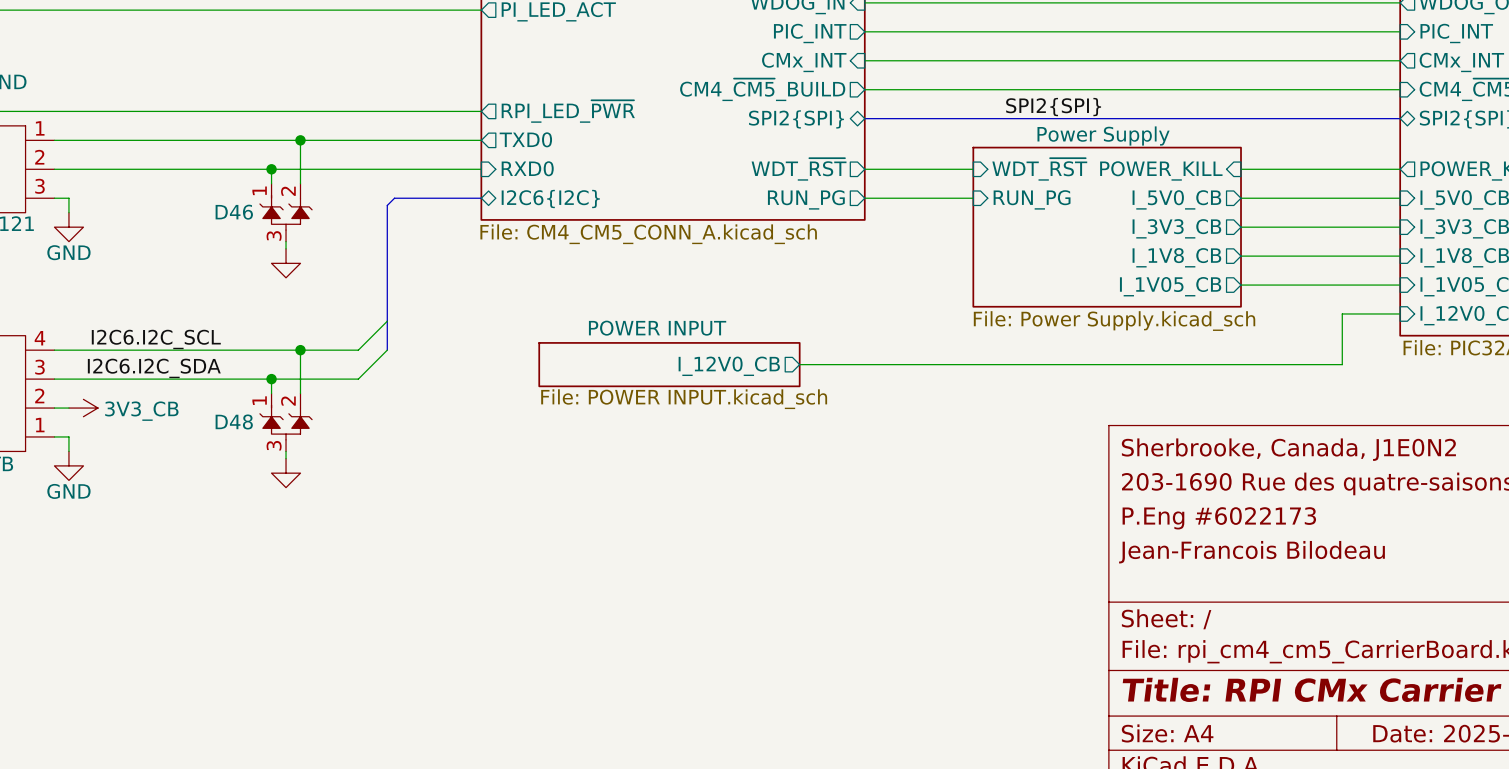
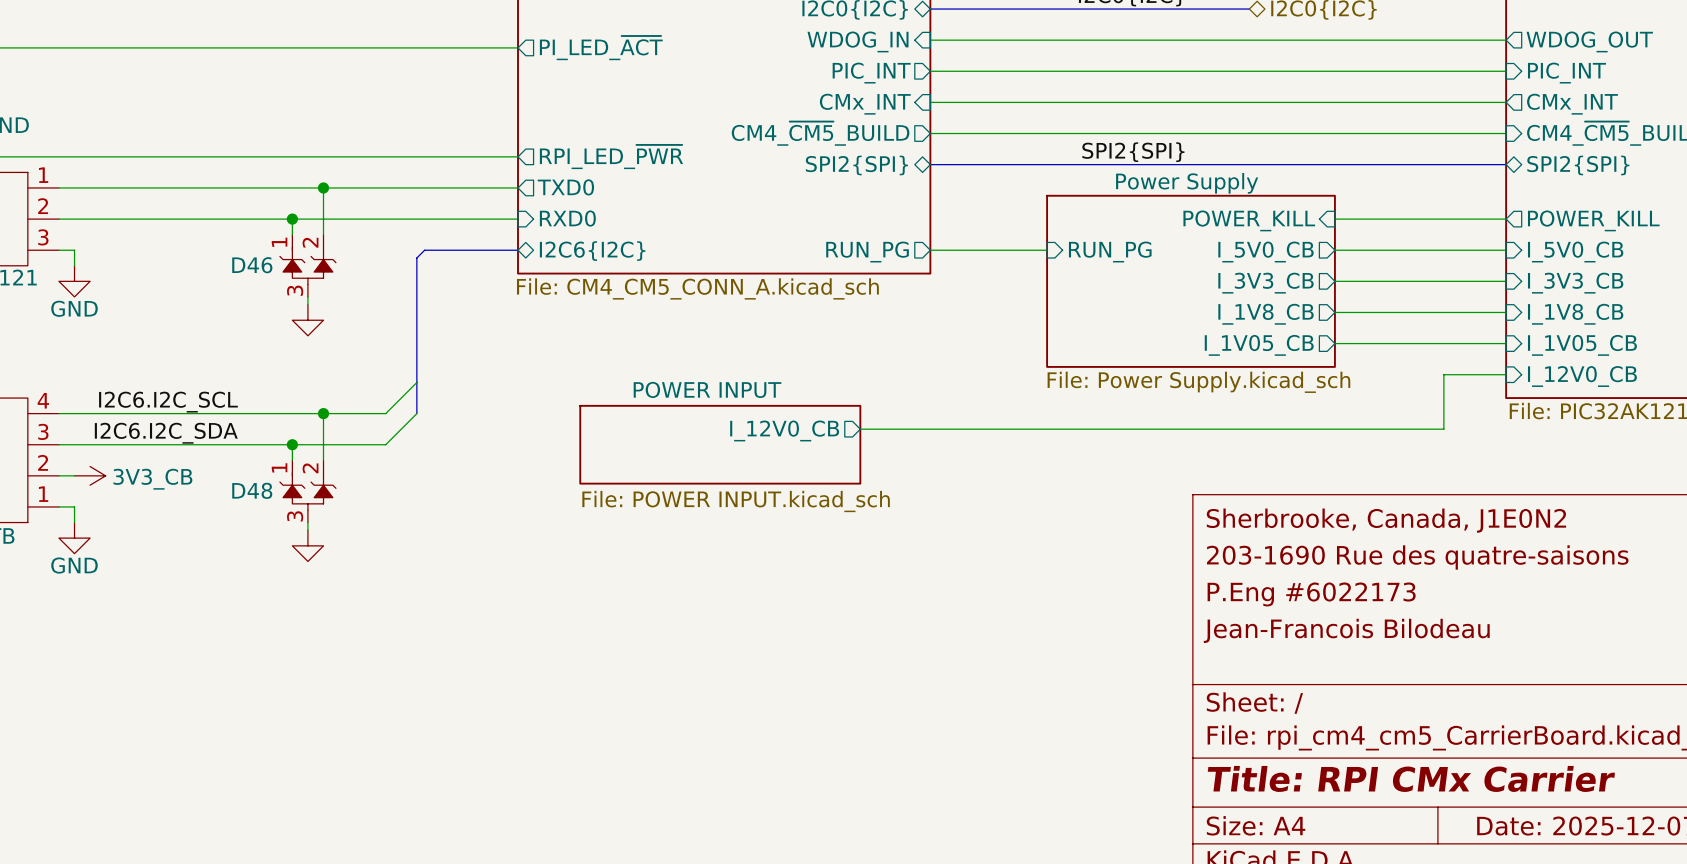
sheet pin: WDT_~{RST} (799, 169) -> none
wire: (864, 169) (973, 169) -> none
sheet pin: WDT_~{RST} (1039, 169) -> none
sheet POWER INPUT: File: POWER INPUT.kicad_sch (669, 364) -> none
sheet POWER INPUT: none -> File: POWER INPUT.kicad_sch (720, 444)

